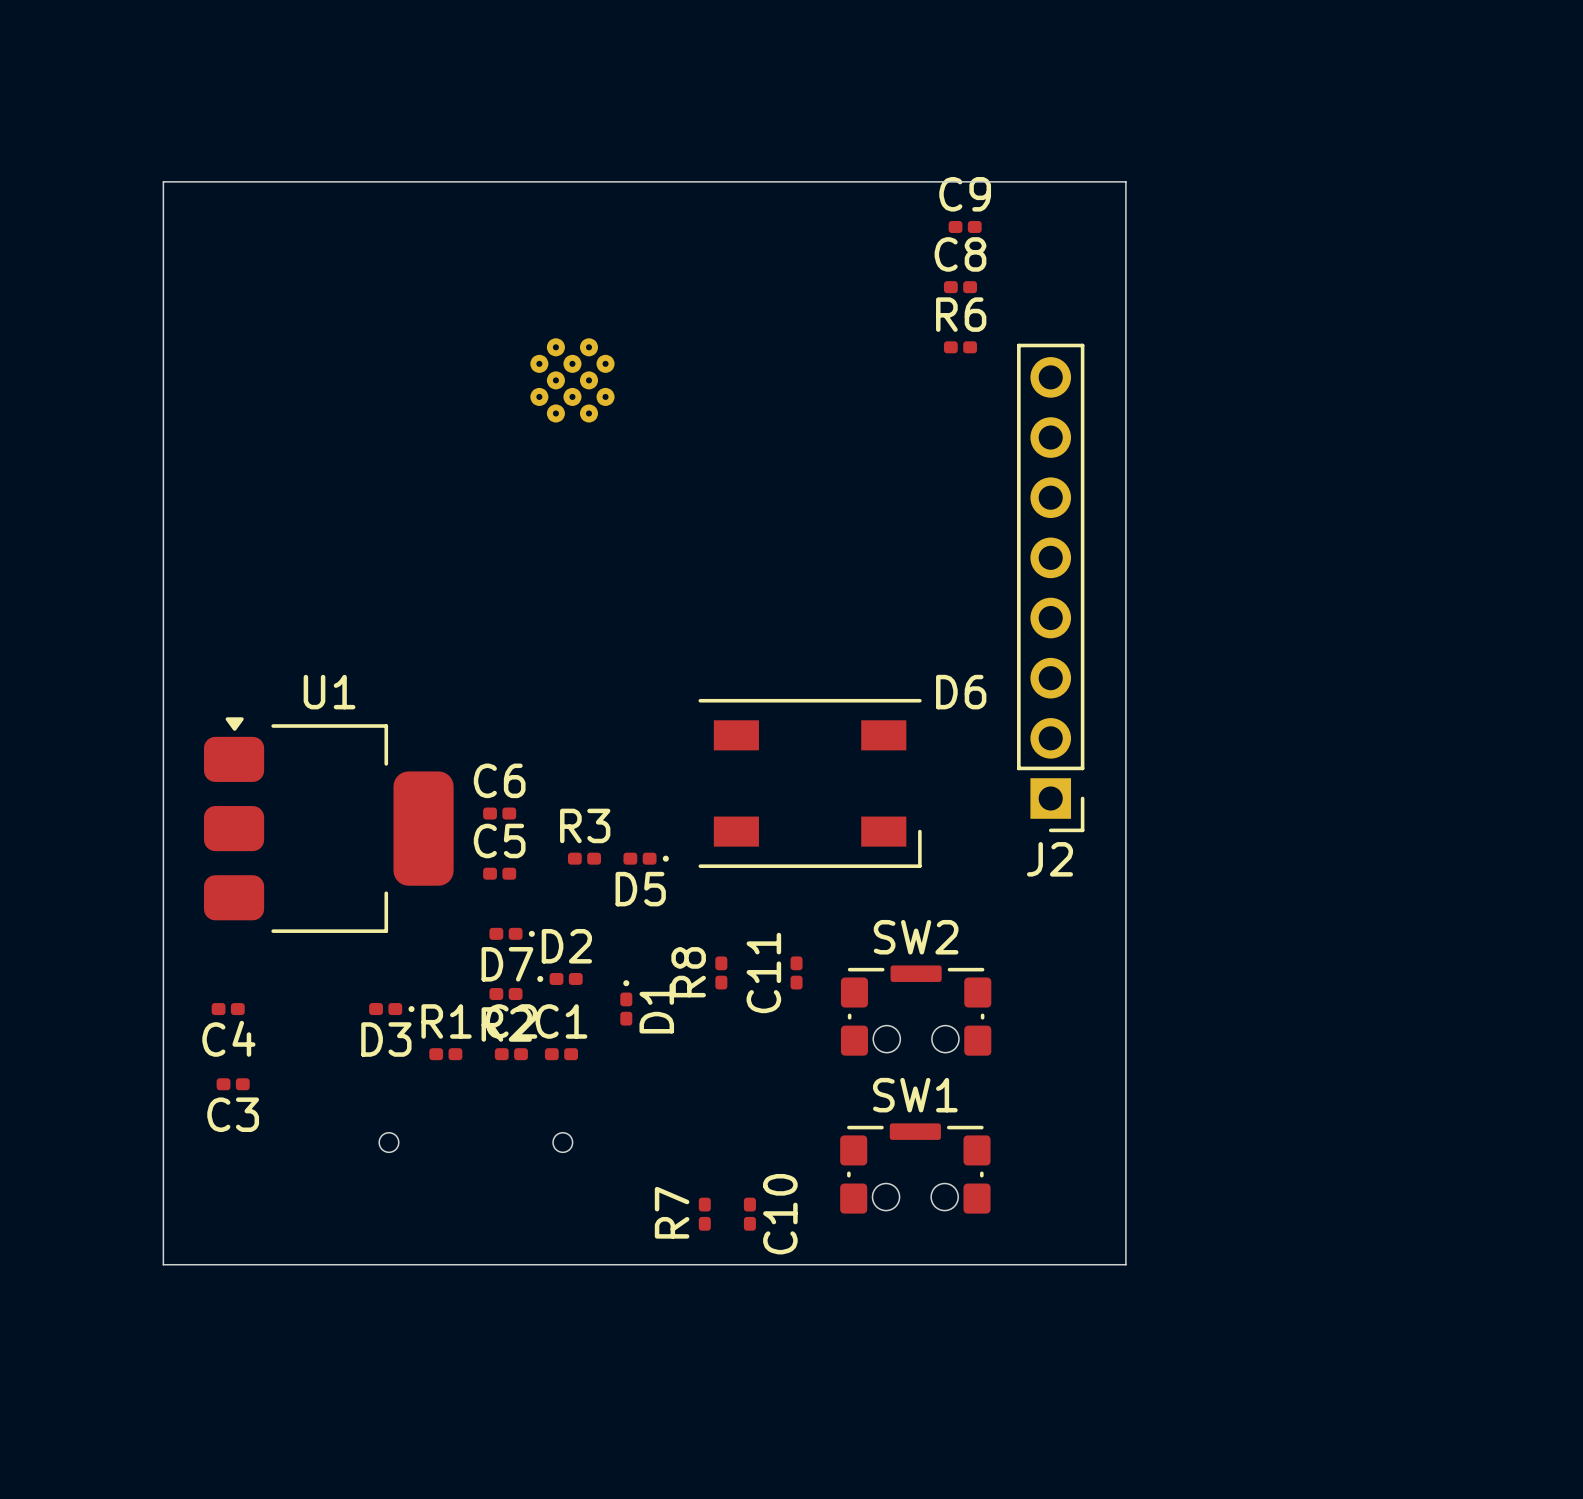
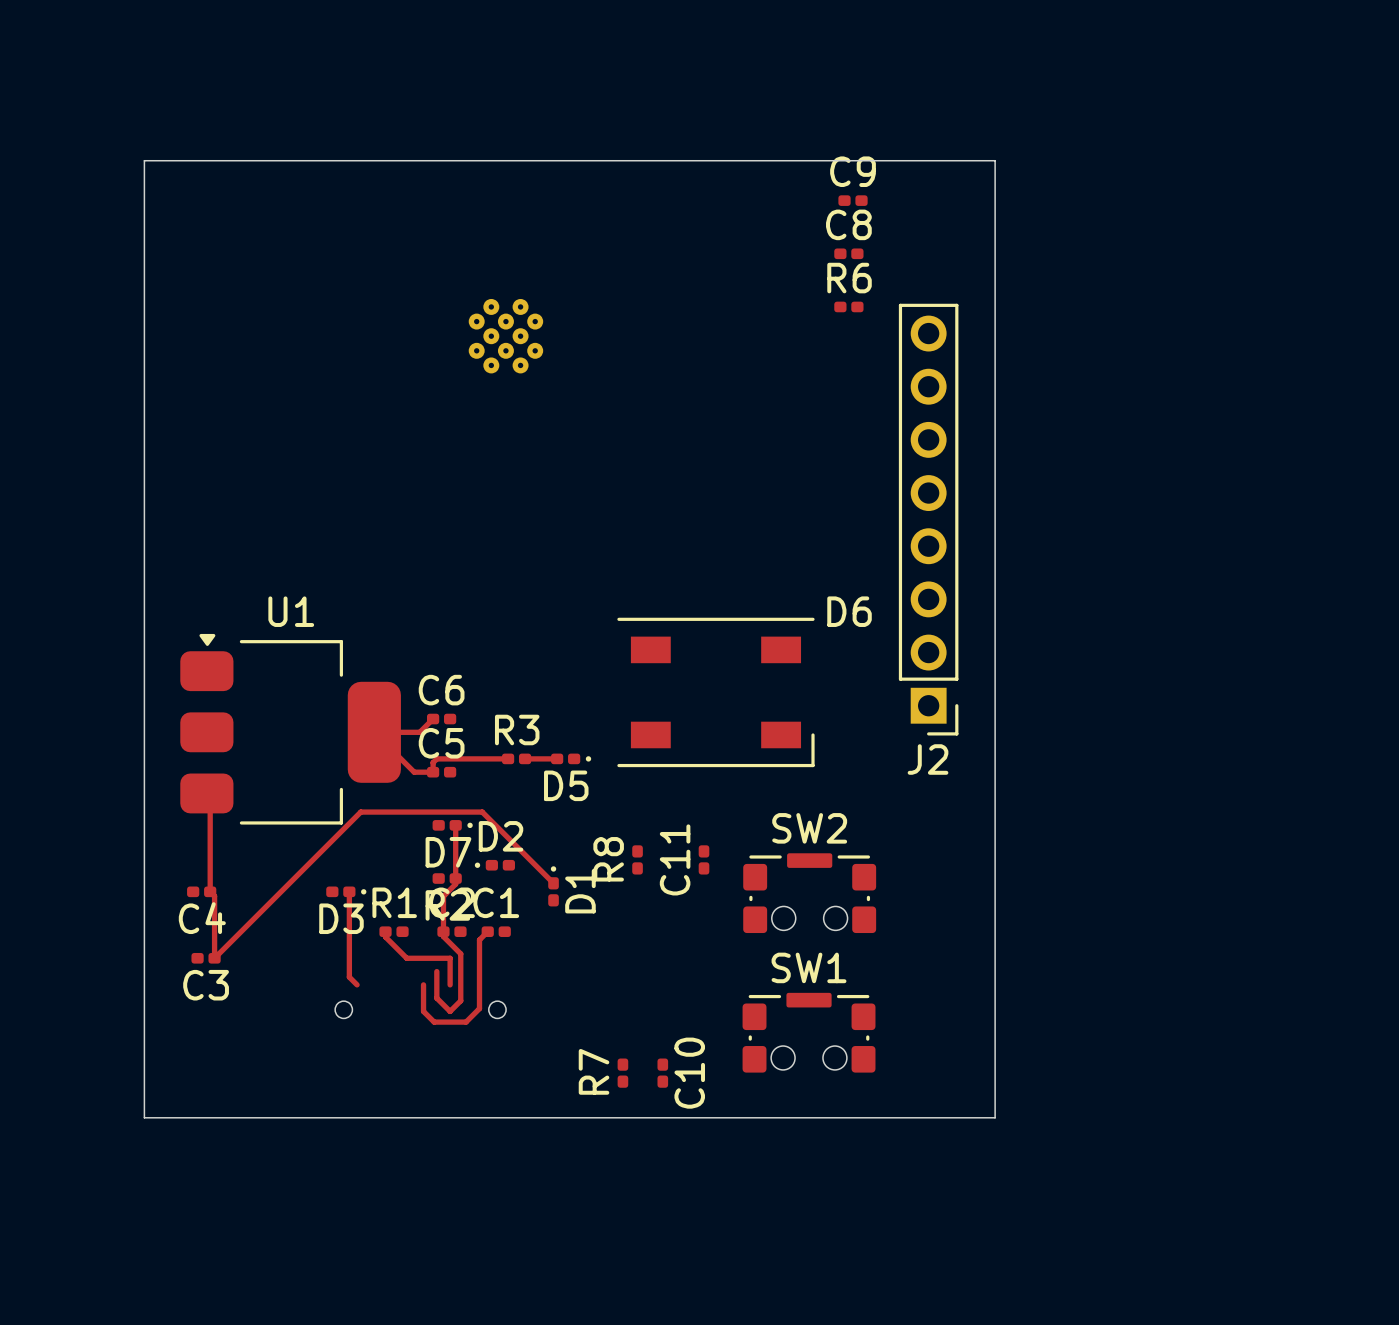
track: none -> (433, 719) (419, 732) (374, 732) (414, 772) (433, 772) (433, 762) (436, 758) (508, 758)
track: none -> (525, 758) (557, 758)
track: none -> (206, 793) (210, 796) (210, 891) (214, 896) (214, 958) (360, 812) (482, 812) (553, 883)
track: none -> (455, 825) (455, 884) (443, 896) (443, 936) (460, 953) (460, 1000) (450, 1011) (436, 998) (436, 971)
track: none -> (349, 891) (349, 977) (357, 984)
track: none -> (385, 931) (385, 937) (406, 958) (450, 958) (450, 984)
track: none -> (487, 931) (479, 939) (479, 1008) (466, 1022) (434, 1022) (423, 1011) (423, 984)

